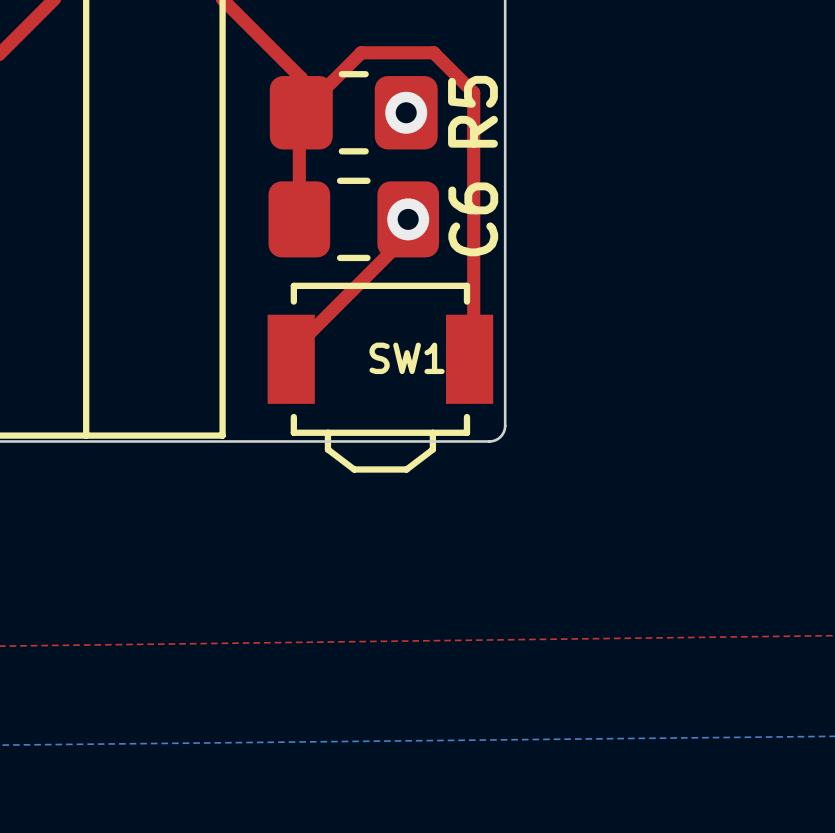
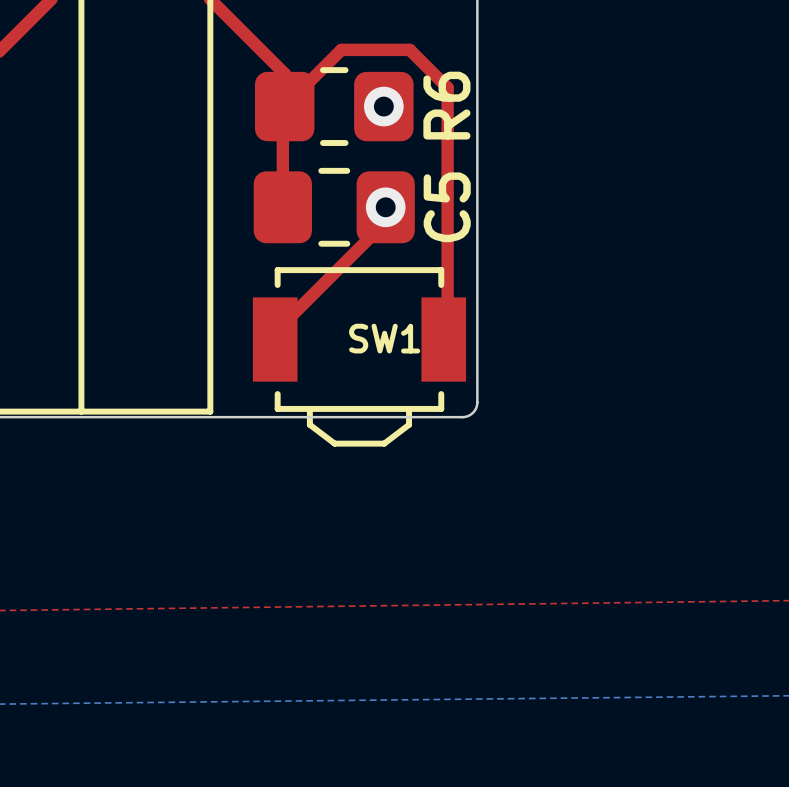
R5 name: R5 (472, 111) -> R6 (446, 105)
C6 name: C6 (473, 219) -> C5 (447, 207)

